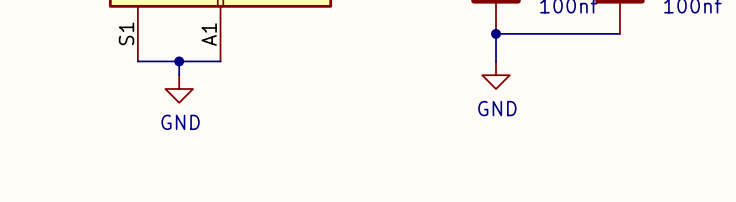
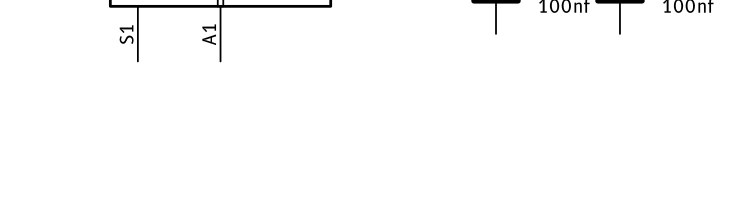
junction: (496, 33) -> none
wire: (619, 33) (496, 33) (496, 61) -> none
wire: (137, 61) (220, 61) -> none
wire: (179, 61) (179, 75) -> none
junction: (179, 61) -> none
power symbol: GND (496, 75) -> none
power symbol: GND (179, 88) -> none

